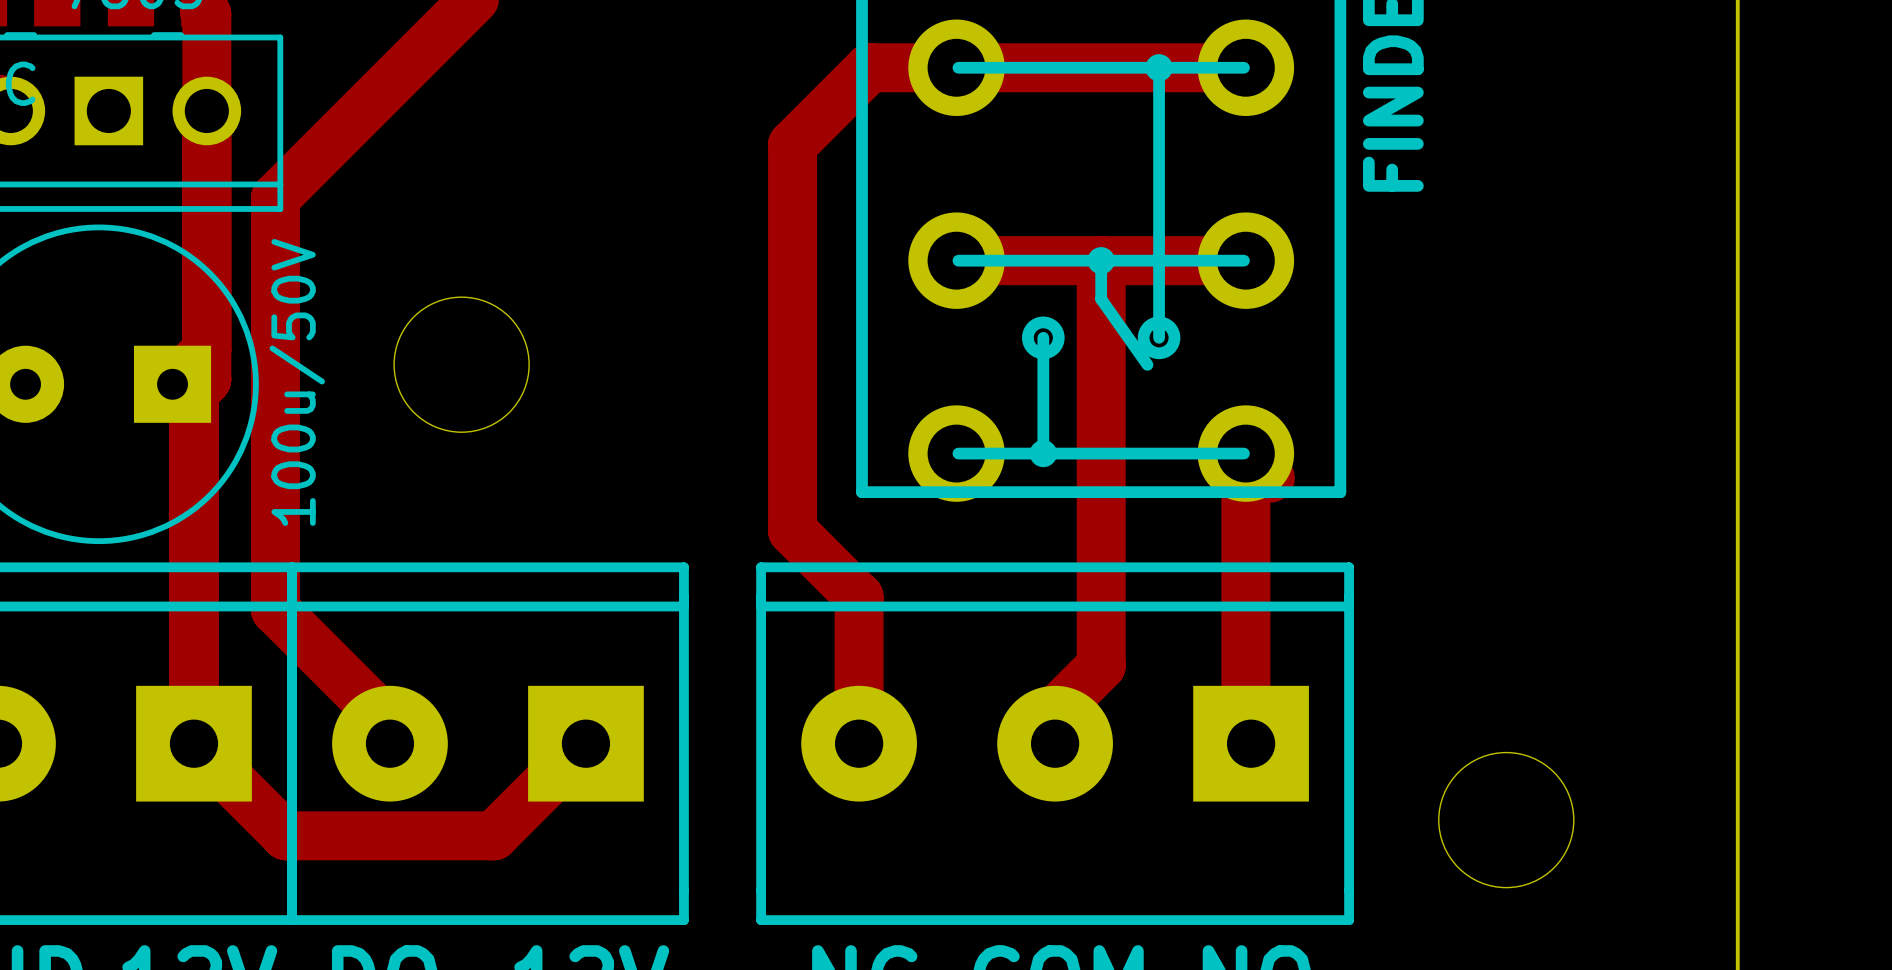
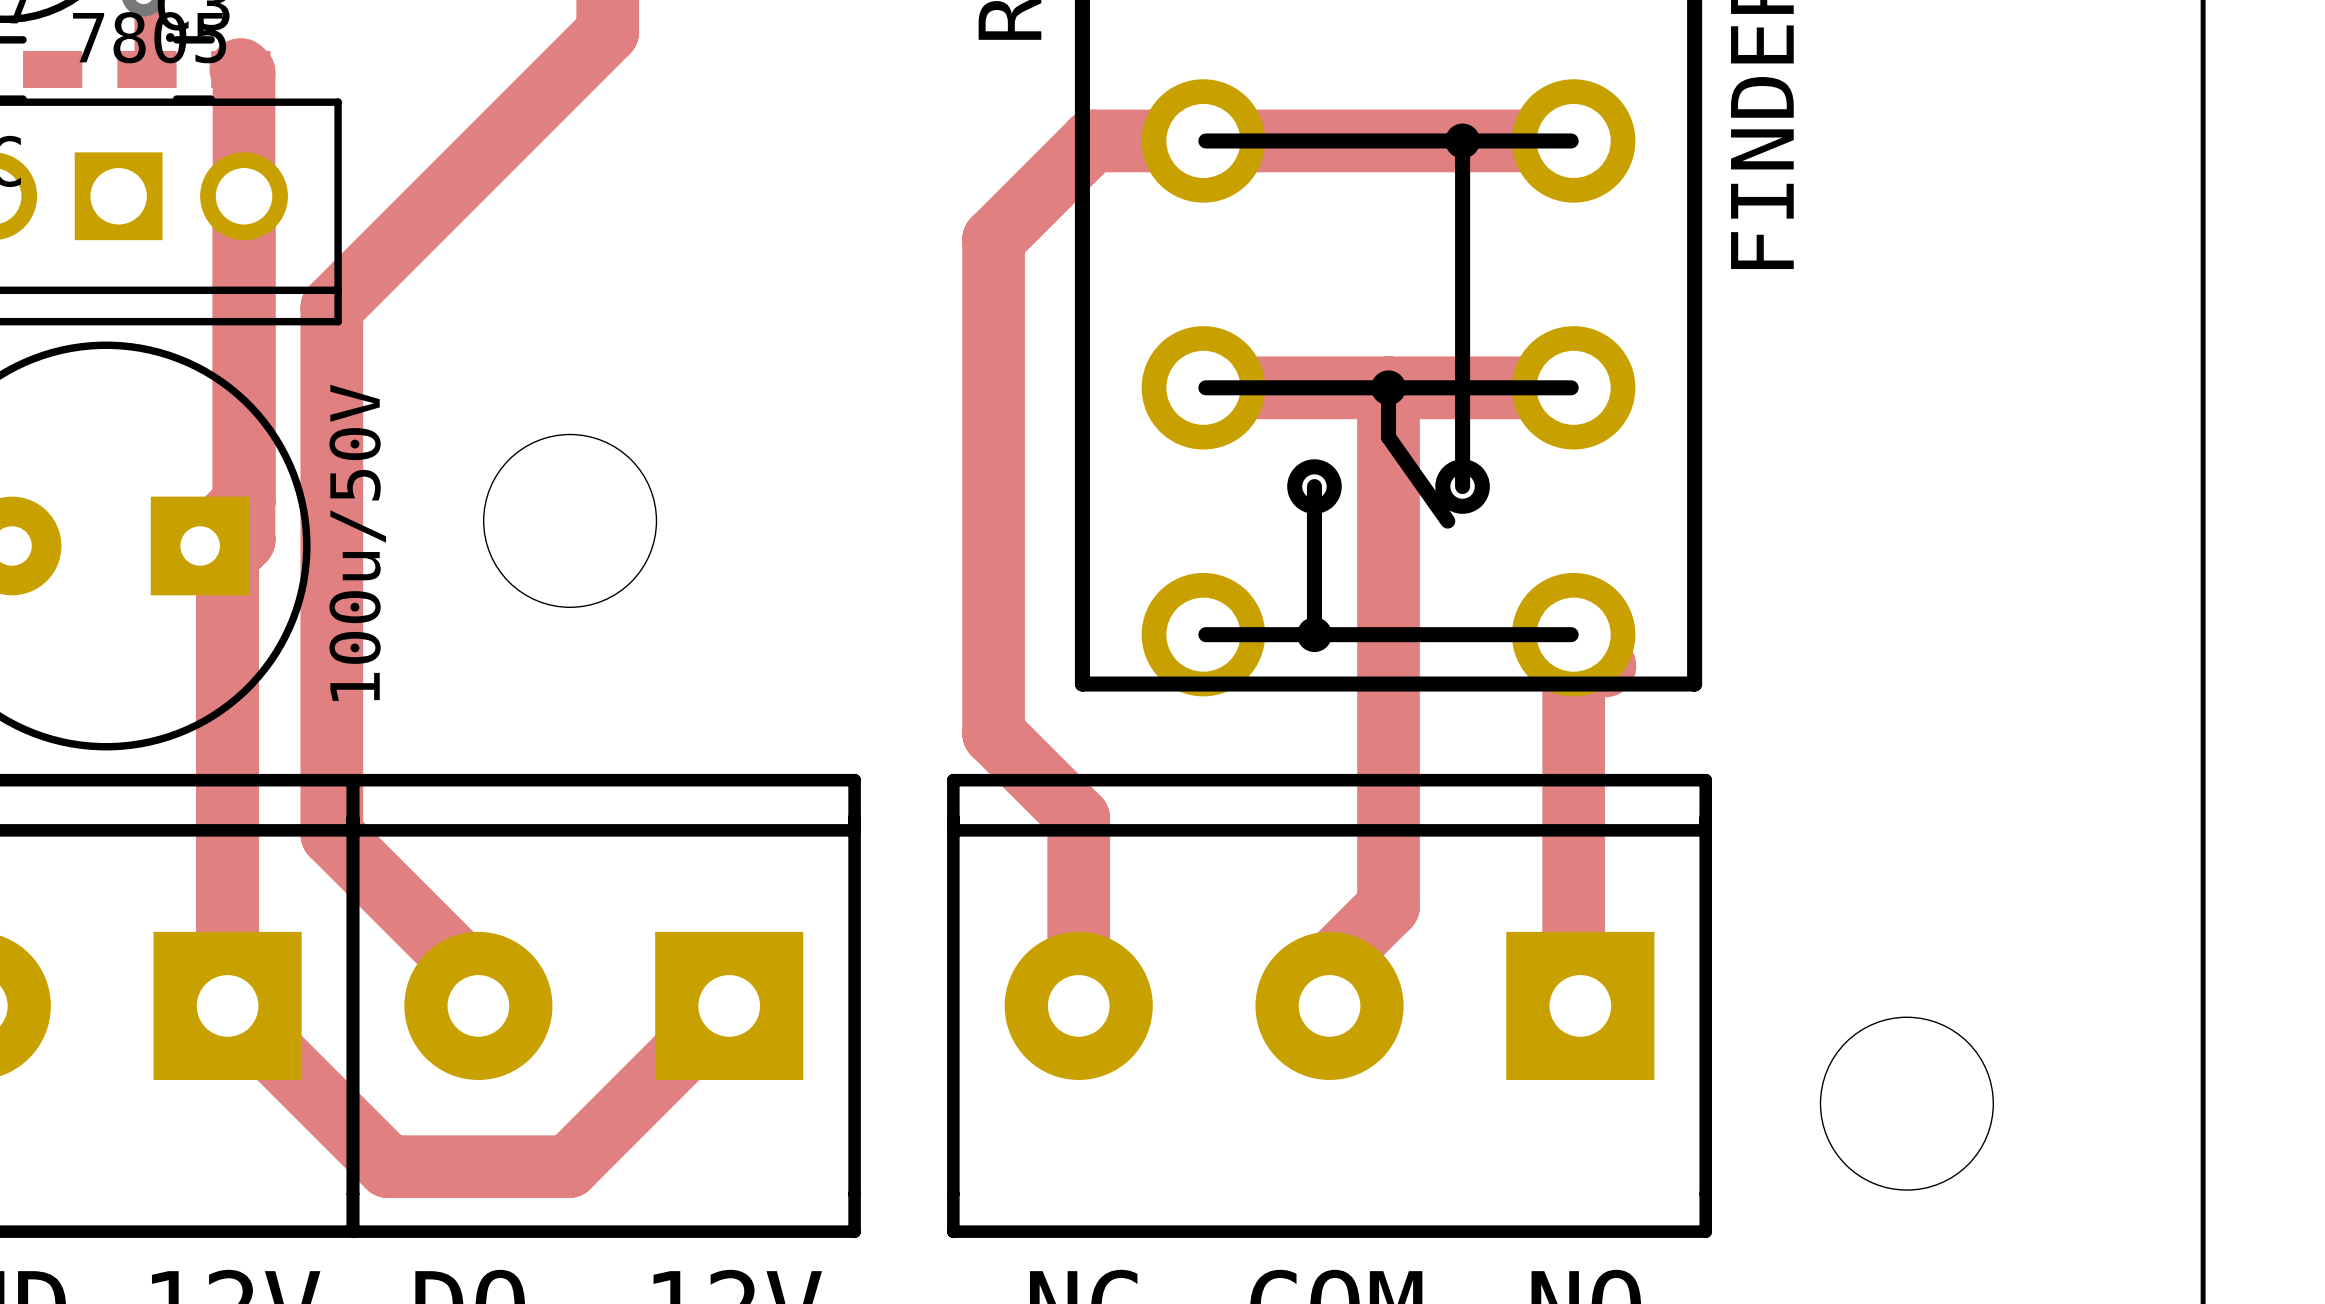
track: (286, 835) (493, 835) -> (345, 1123) (388, 1166) (568, 1166) (611, 1123)

